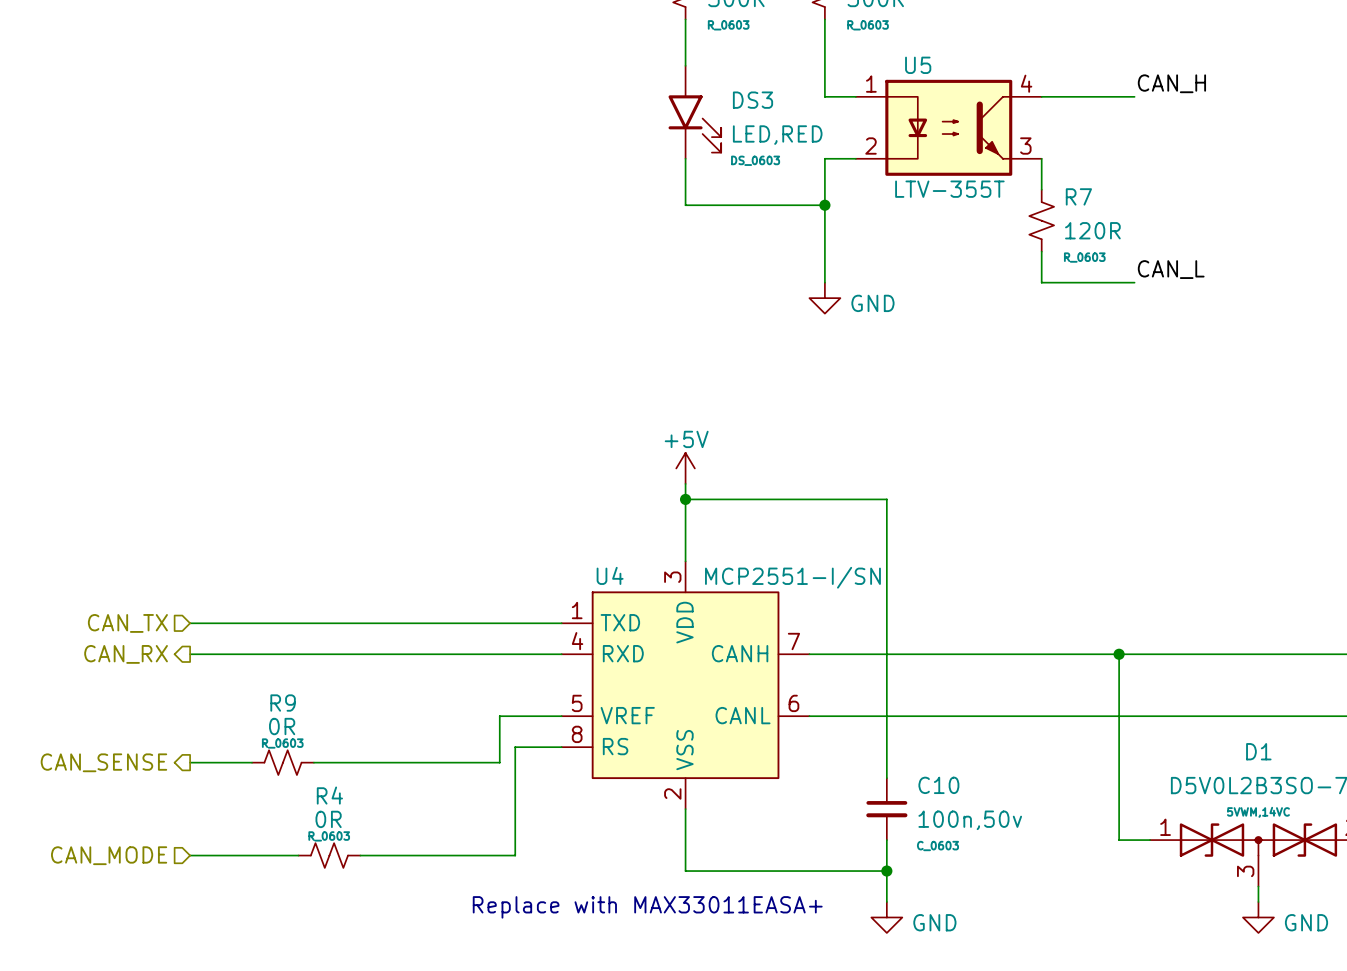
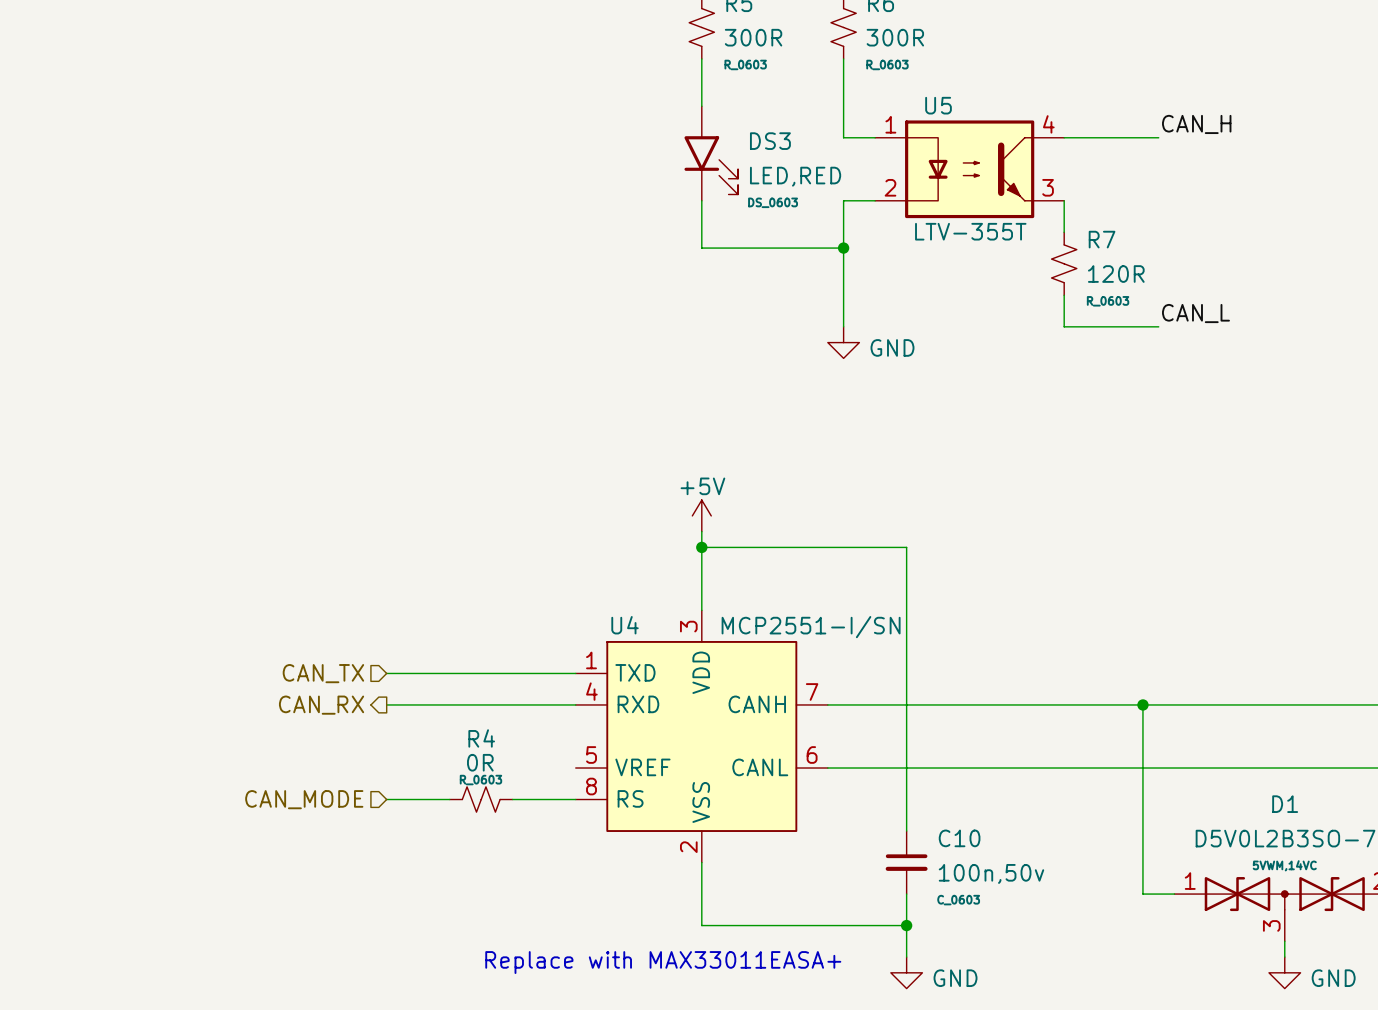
hierarchical label position: CAN_TX (127, 623) -> CAN_TX (323, 673)
wire: (190, 623) (375, 623) -> none
hierarchical label position: CAN_RX (126, 654) -> CAN_RX (321, 705)
wire: (190, 654) (375, 654) -> none
wire: (561, 716) (499, 716) (499, 762) (313, 762) -> none
wire: (515, 747) (515, 855) (360, 855) -> (528, 799) (512, 799)
hierarchical label: CAN_SENSE (103, 762) -> none
wire: (190, 762) (252, 762) -> (386, 799) (449, 799)
R9: 0R (282, 762) -> none
hierarchical label position: CAN_MODE (109, 855) -> CAN_MODE (304, 799)
wire: (190, 855) (298, 855) -> none
R4 position: (329, 855) -> (481, 799)

